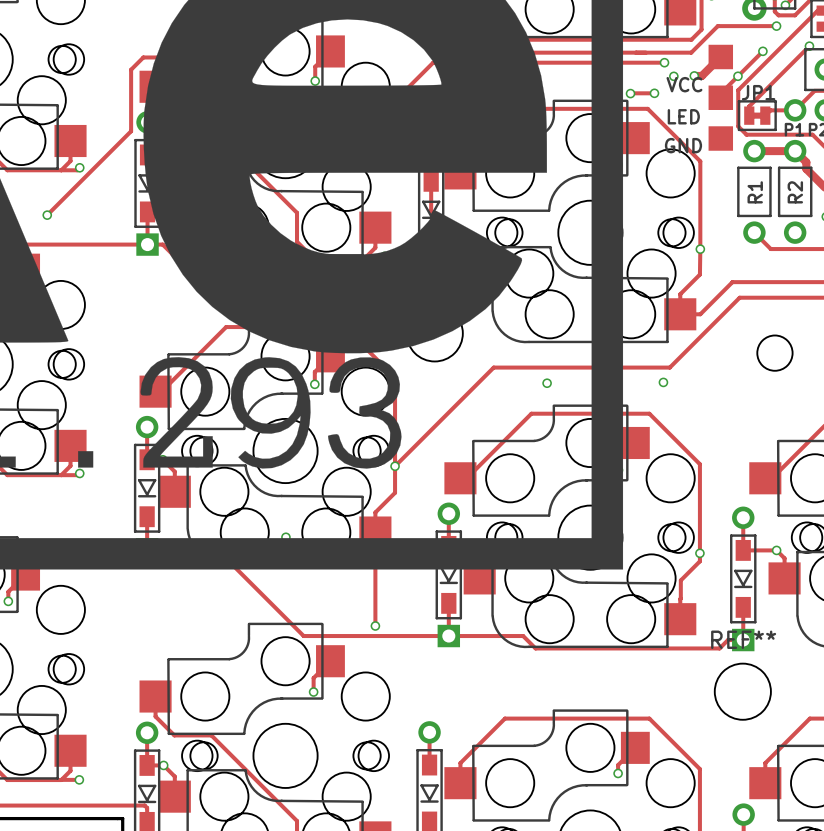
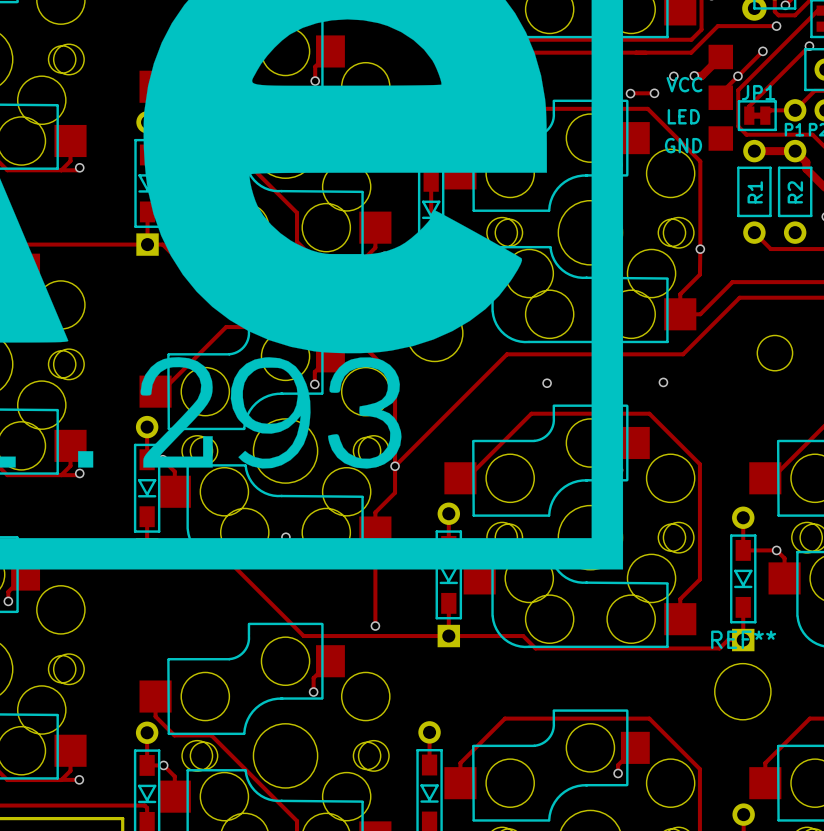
track: (664, 62) (433, 62) (379, 116) (351, 116) (336, 100) (262, 100) (219, 57) (143, 57) (131, 69) (131, 131) (47, 215) -> none
via: (664, 62) -> none
via: (47, 215) -> none
track: (683, 354) (669, 367) (493, 367) -> (683, 354) (506, 354) (493, 367)
via: (699, 553) -> none
track: (699, 561) (680, 580) (680, 598) -> (699, 561) (699, 579) (680, 598)

